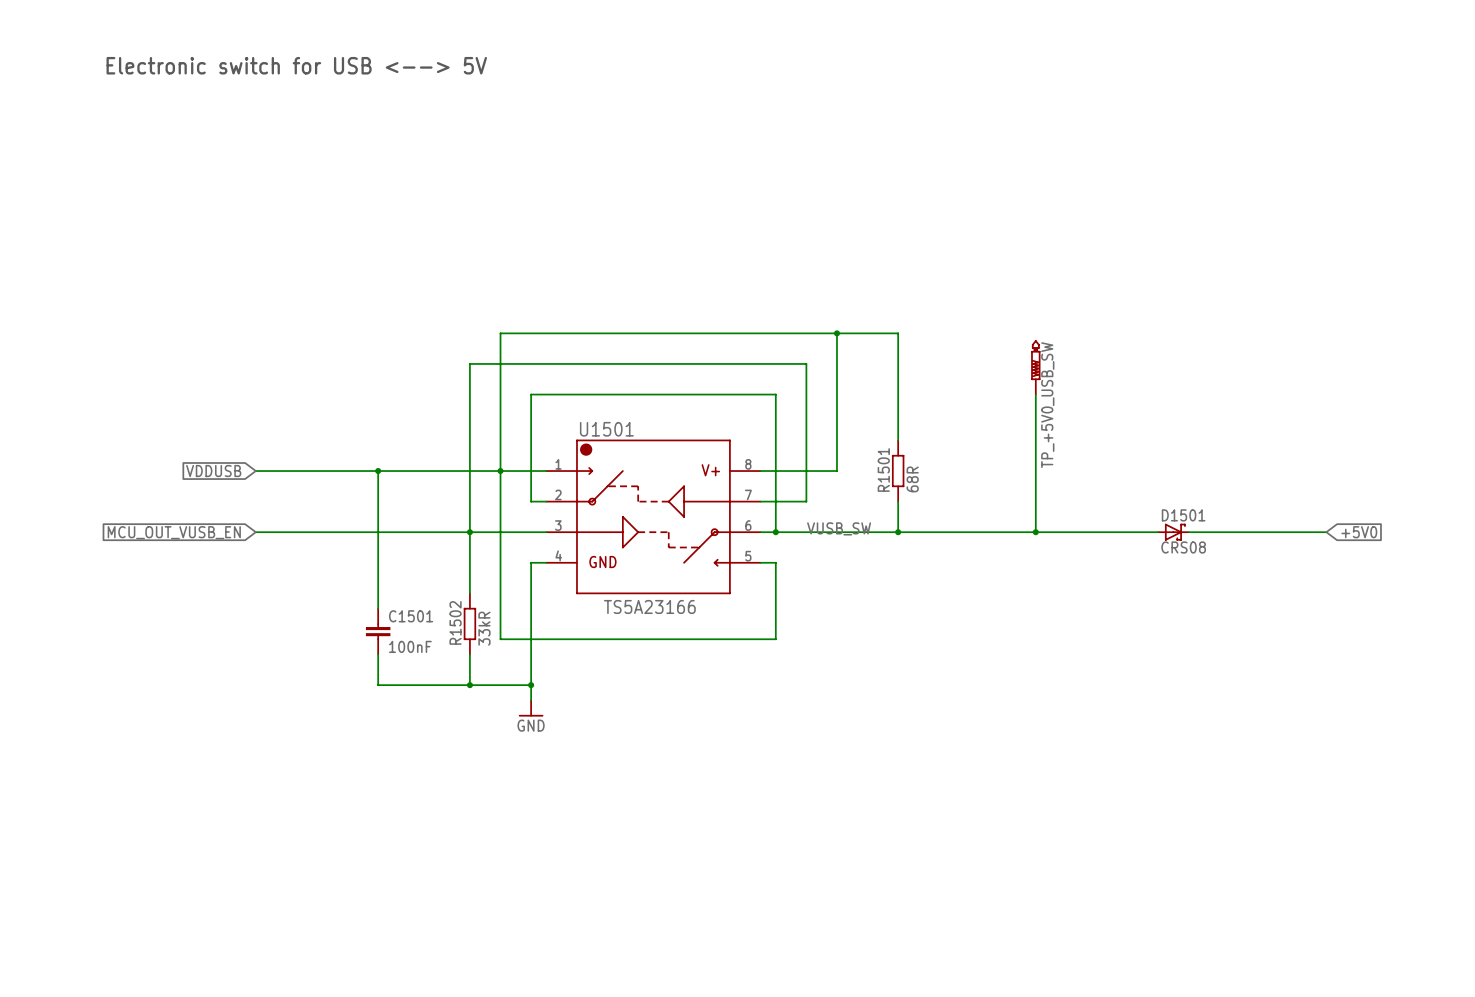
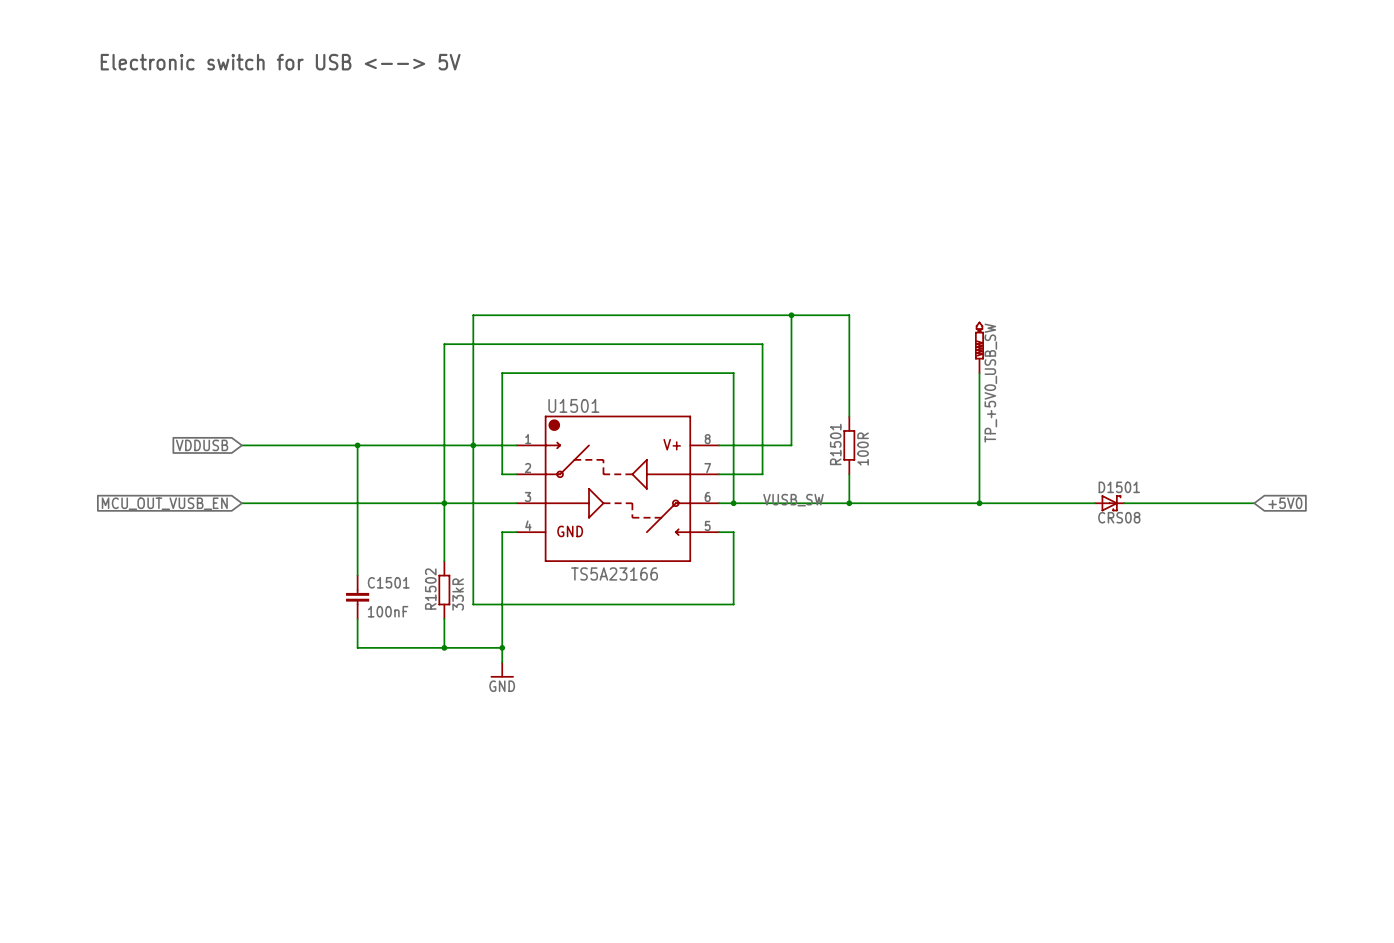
R1501 value: 68R (912, 479) -> 100R (863, 449)

